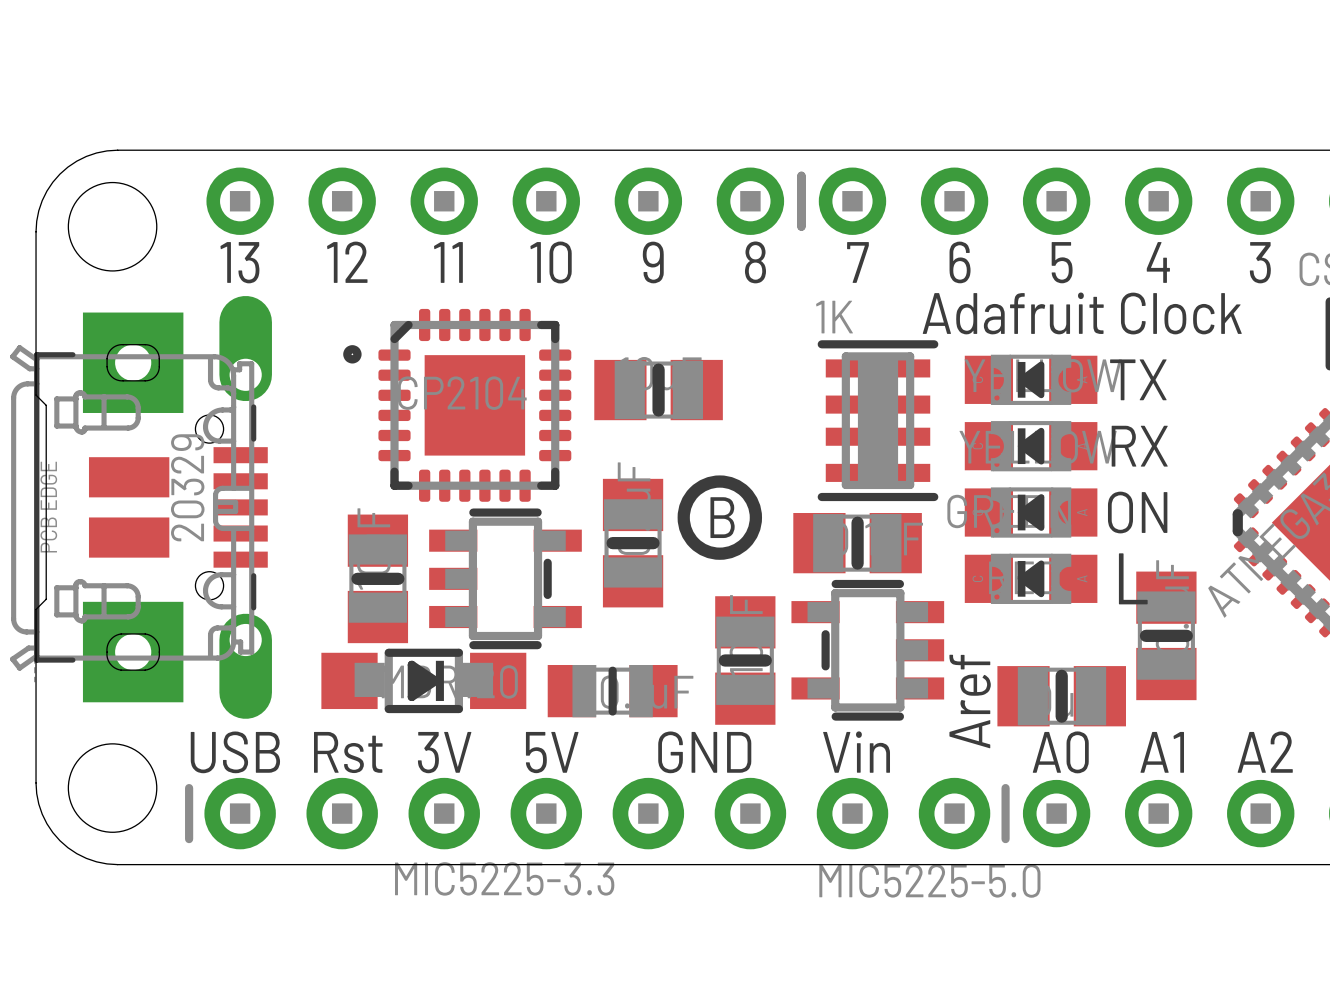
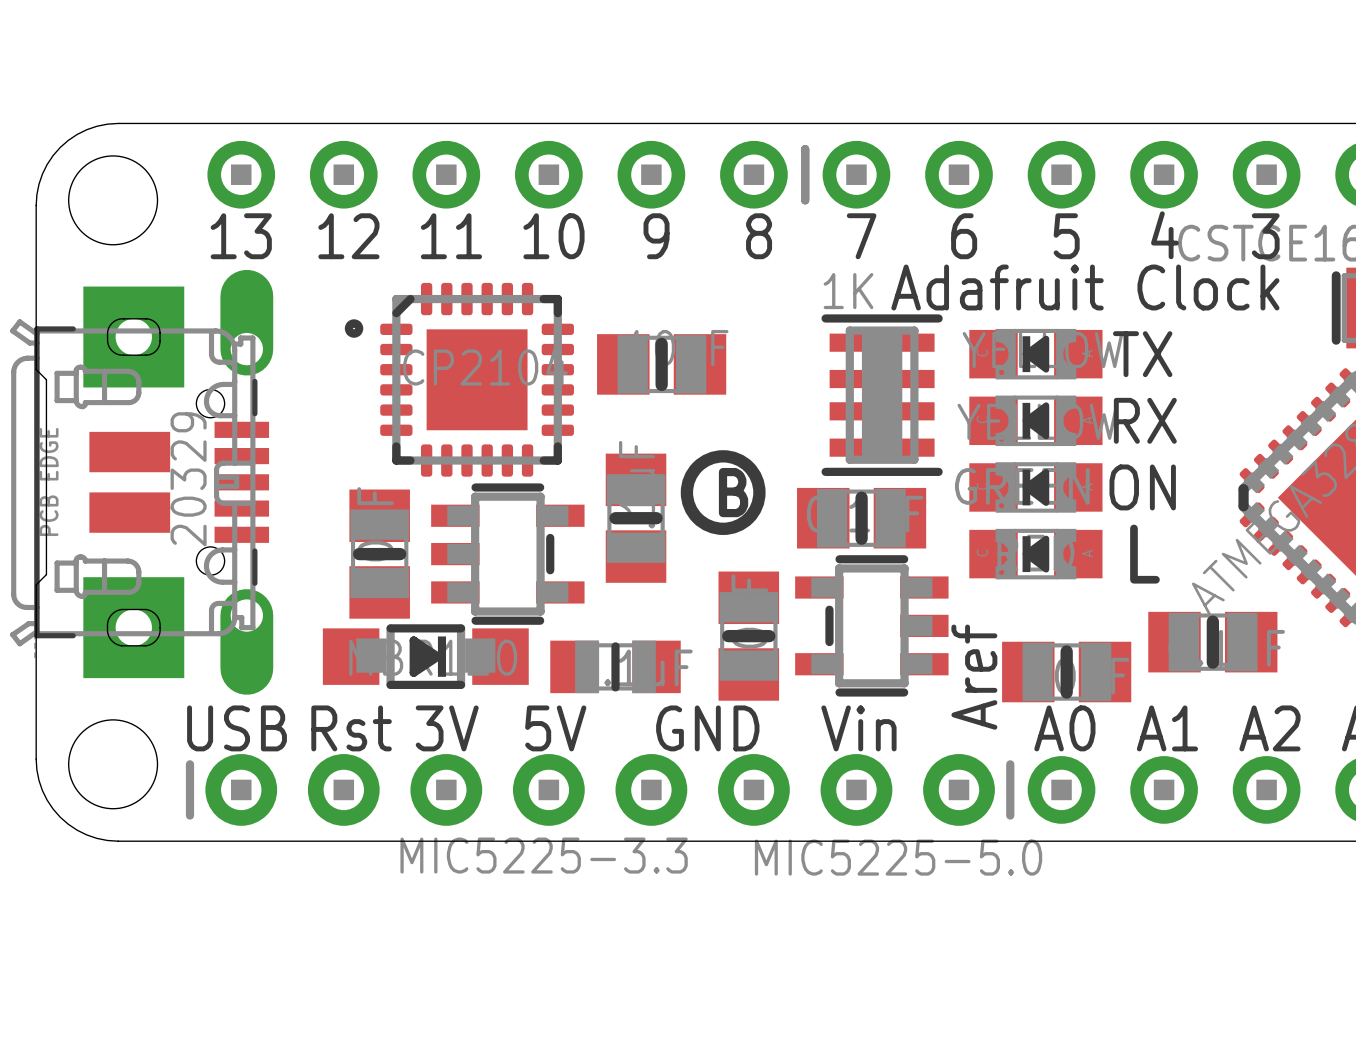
part rotation: 0° (1166, 635) -> 90° clockwise (1212, 642)

